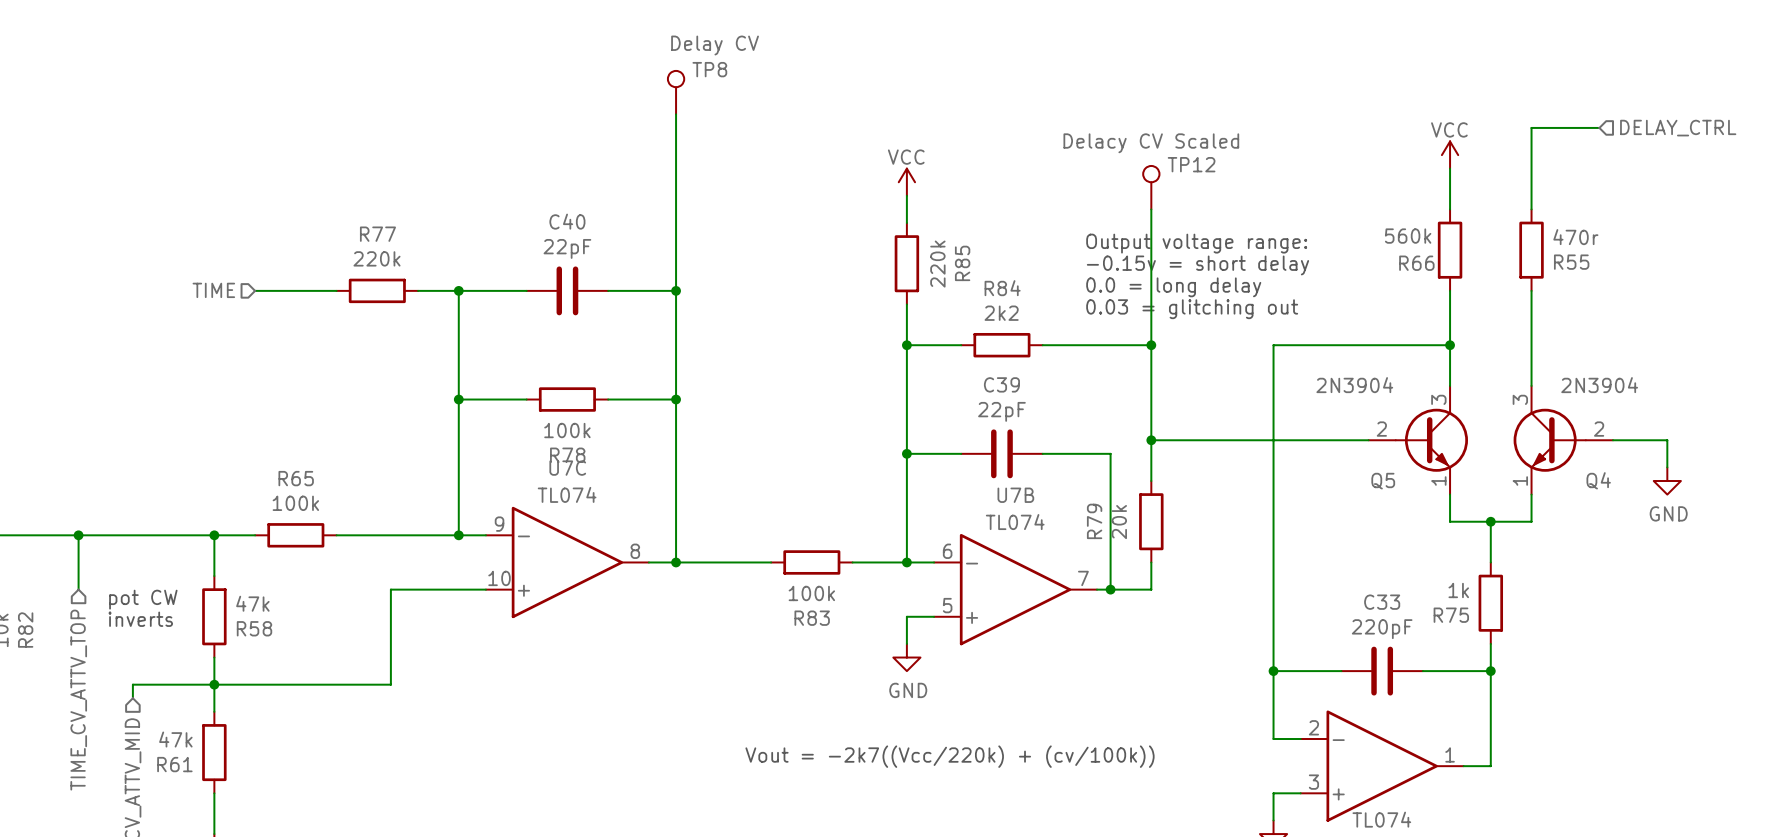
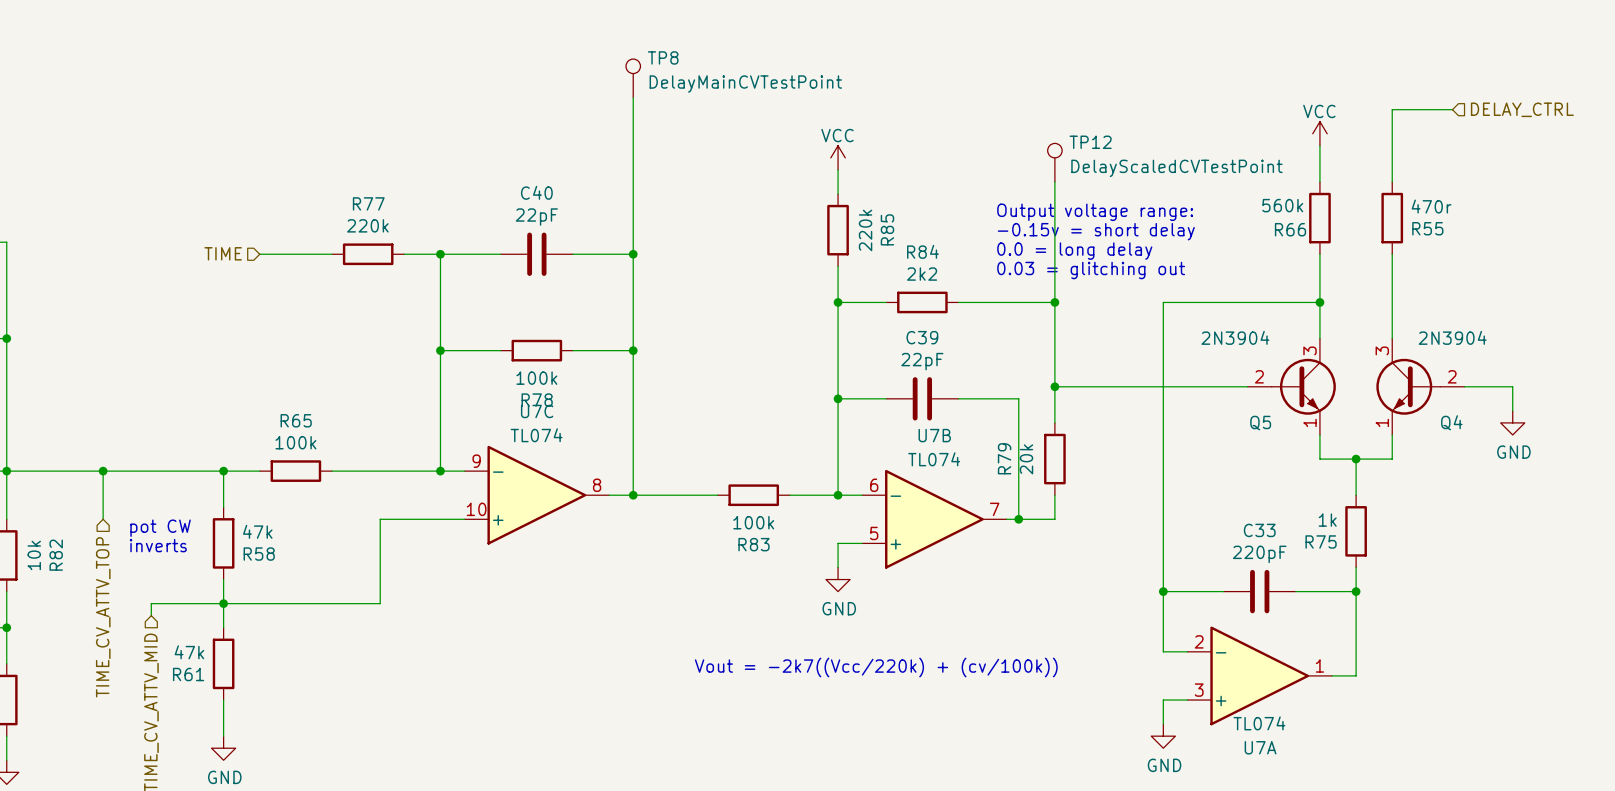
TP8 text: Delay CV (715, 45) -> none
TP8 value: none -> DelayMainCVTestPoint (745, 84)
TP12 text: Delacy CV Scaled (1151, 143) -> none
TP12 value: none -> DelayScaledCVTestPoint (1176, 168)

